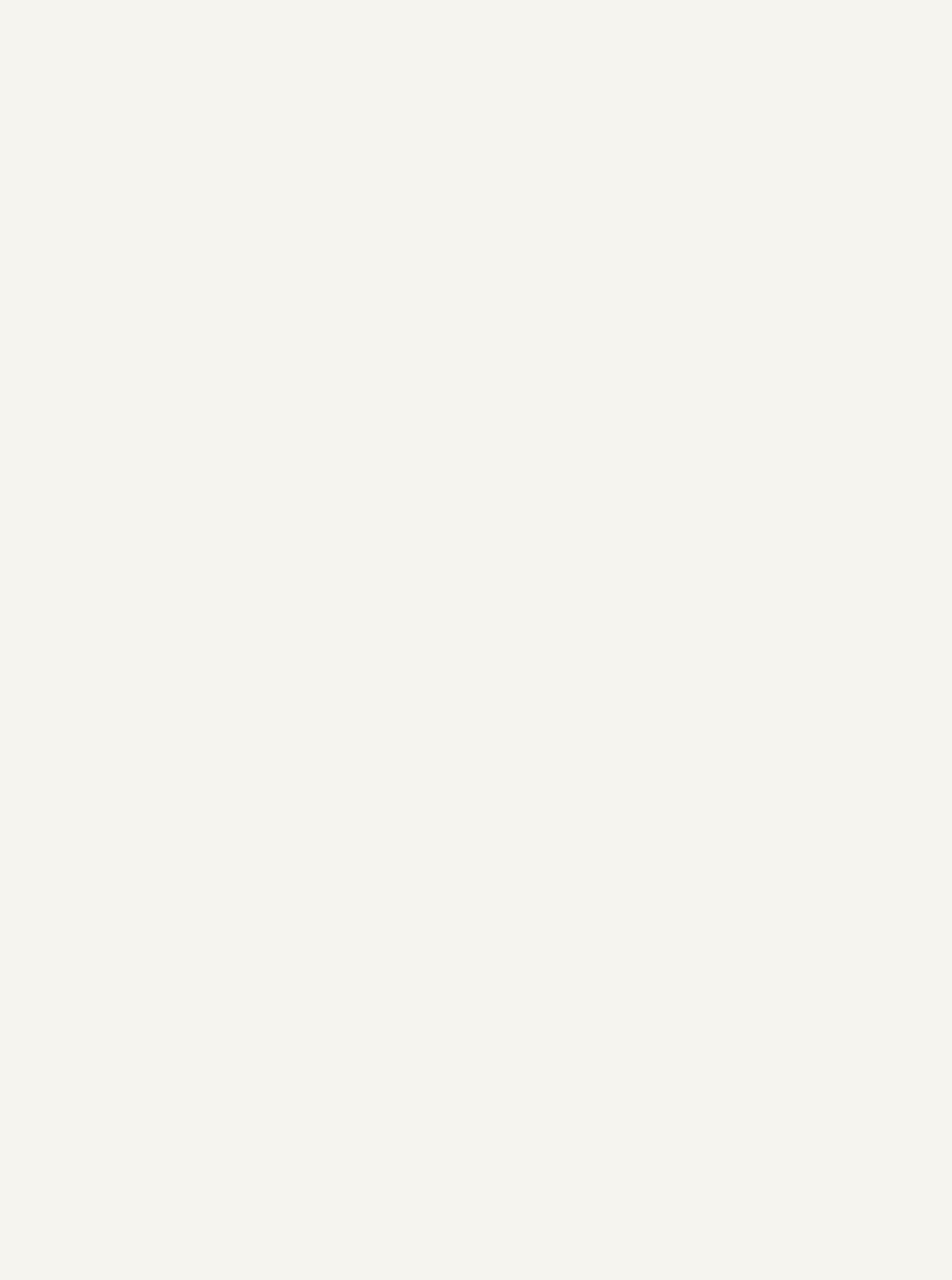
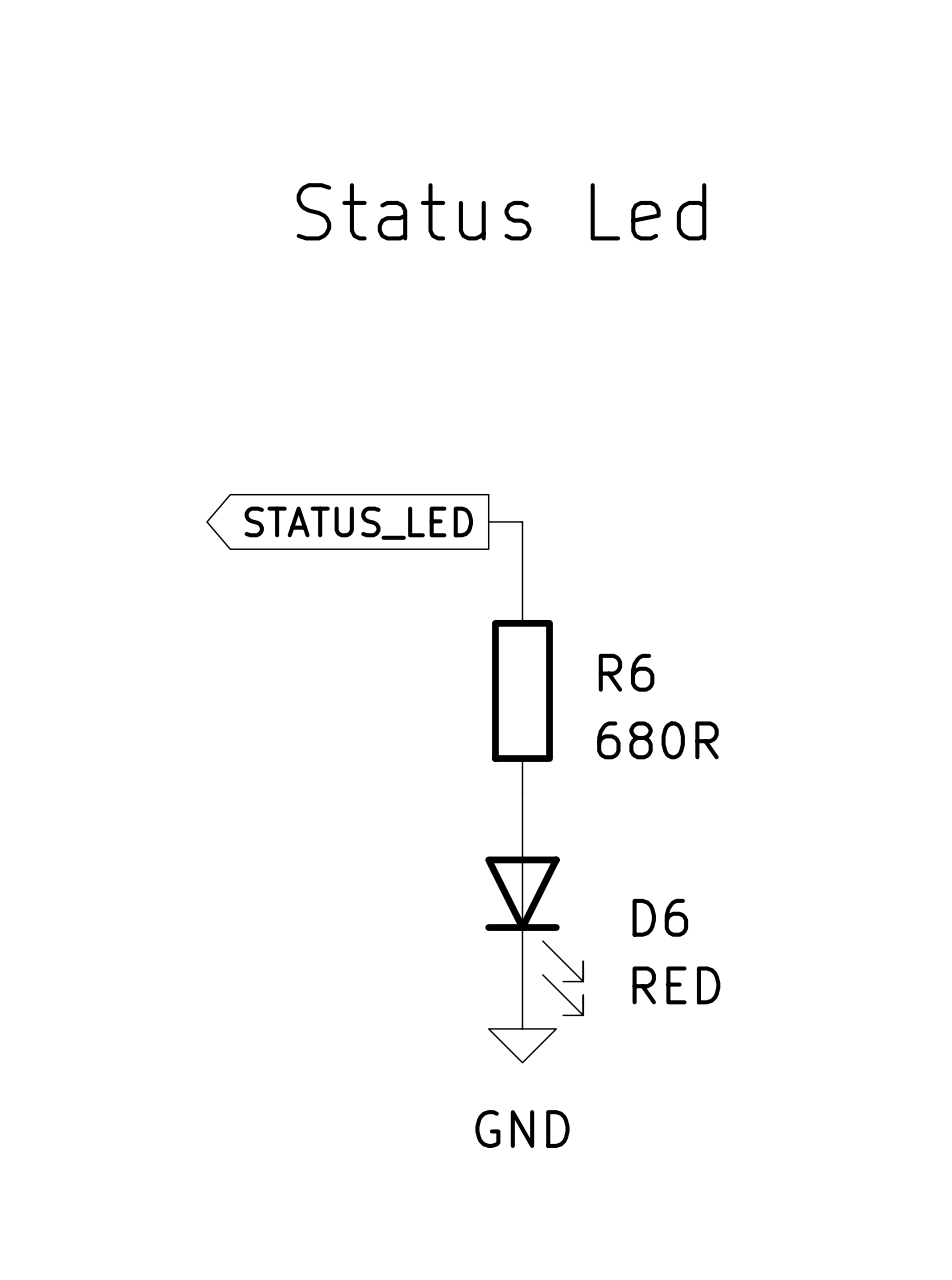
text: none -> Status Led (501, 211)
wire: none -> (488, 521) (522, 521) (522, 589)
global label: none -> STATUS_LED (358, 523)
R6: none -> 680R (522, 690)
D6: none -> RED (534, 903)
power symbol: none -> GND (522, 1028)

